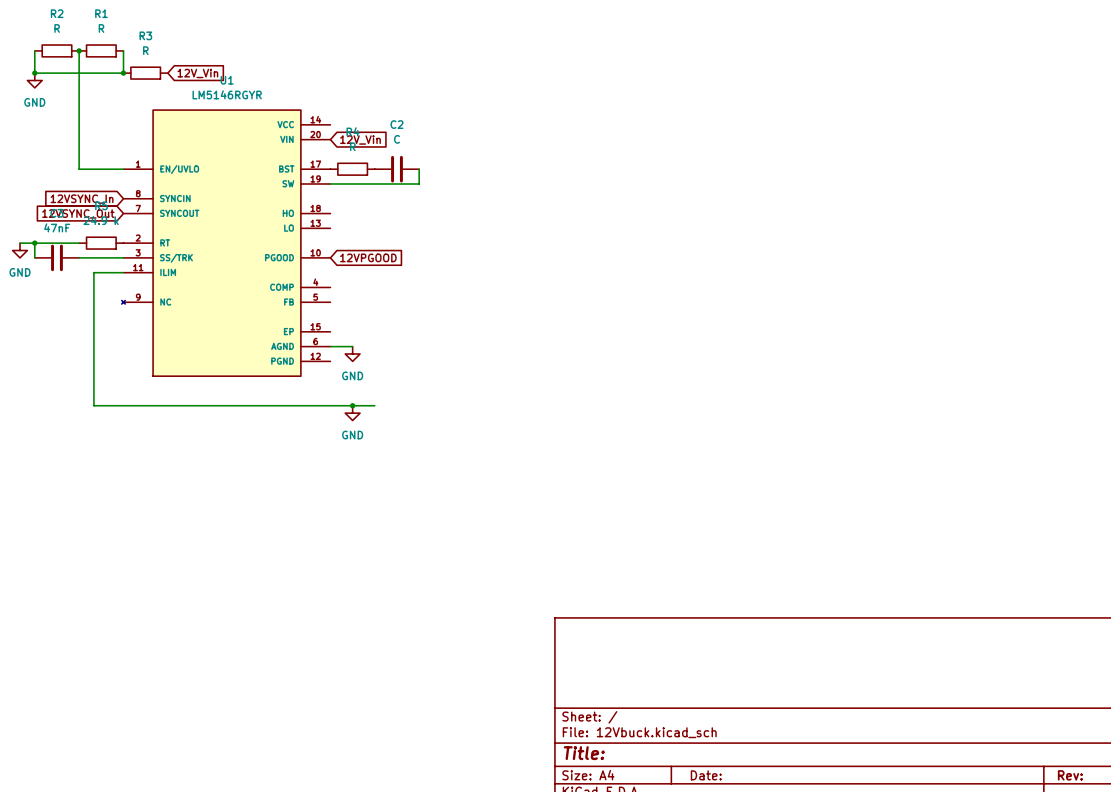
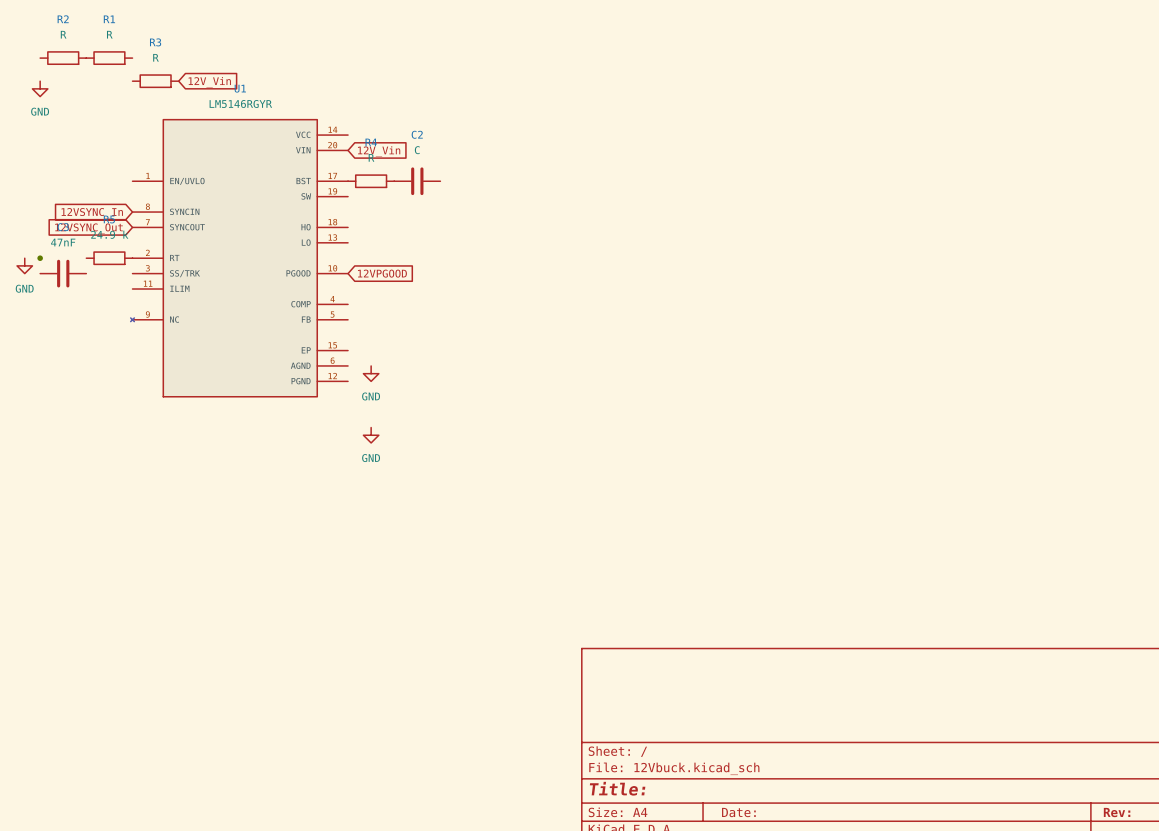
wire: (34, 50) (34, 73) (123, 73) (123, 50) -> none
wire: (79, 50) (79, 169) (123, 169) -> none
junction: (79, 50) -> none
junction: (34, 73) -> none
junction: (123, 73) -> none
wire: (419, 169) (419, 183) (330, 183) -> none
wire: (20, 243) (79, 243) -> none
wire: (34, 243) (34, 257) -> none
wire: (79, 257) (123, 257) -> none
wire: (123, 272) (93, 272) (93, 405) (374, 405) -> none
wire: (330, 346) (352, 346) -> none
junction: (352, 405) -> none

